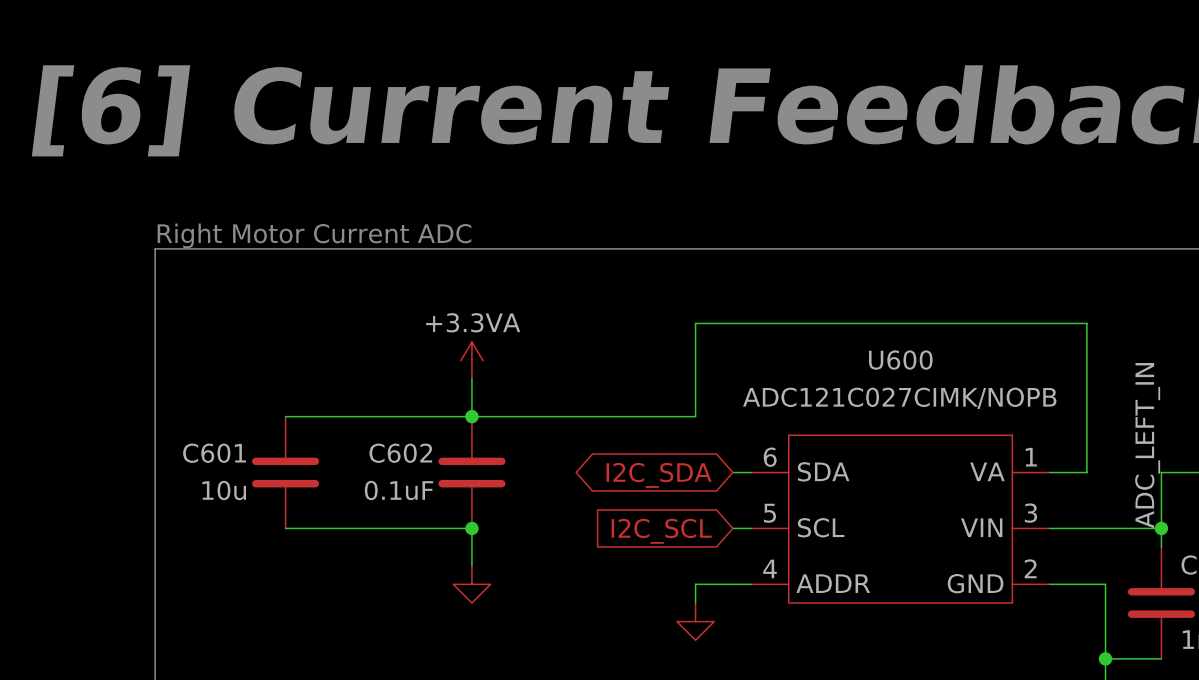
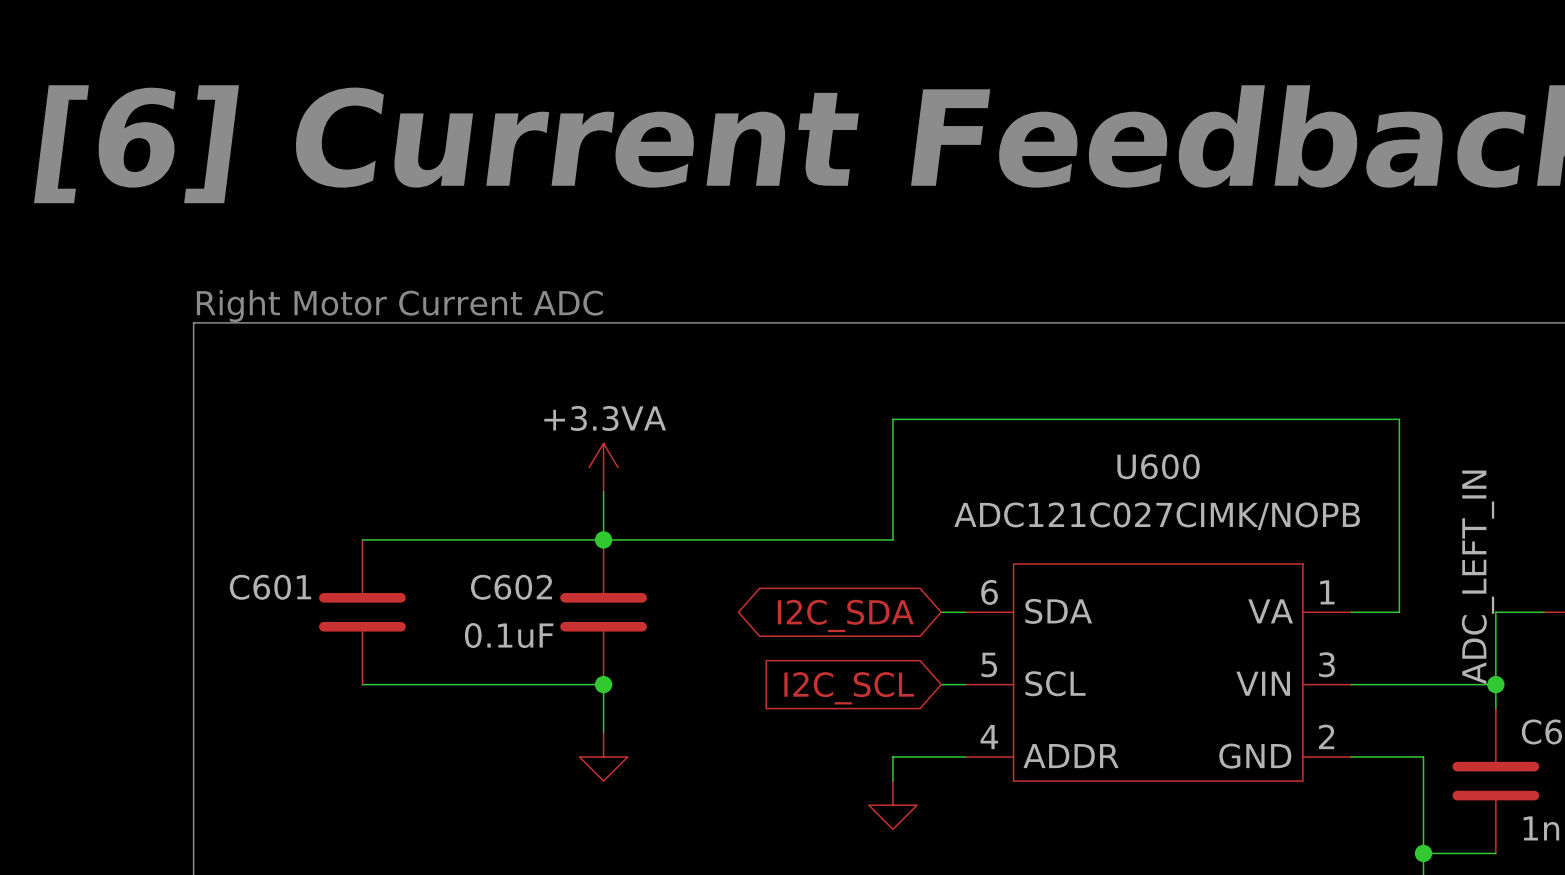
C601 value: 10u (224, 490) -> none

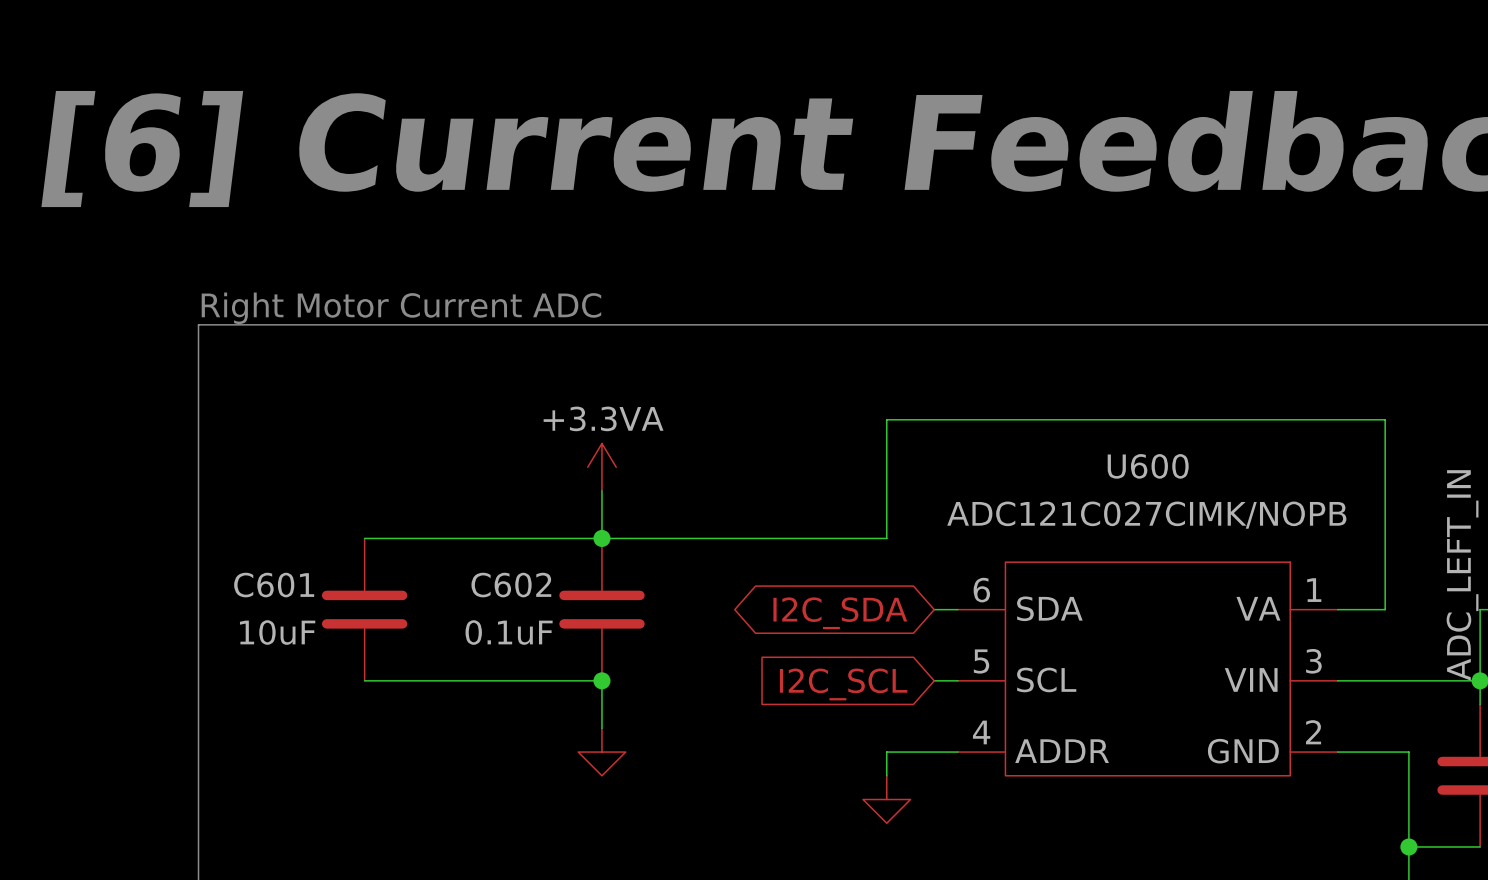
C601 value: none -> 10uF (277, 632)

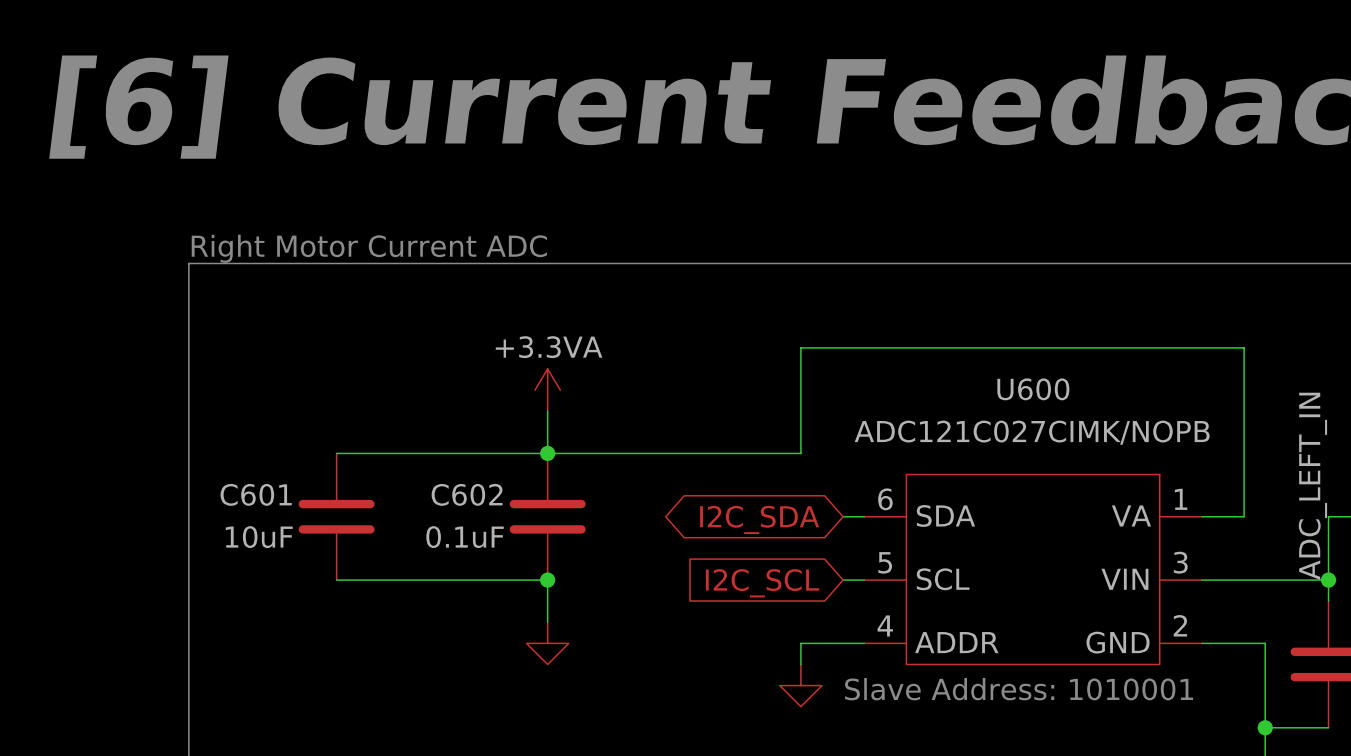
text: none -> Slave Address: 1010001 (1019, 689)

